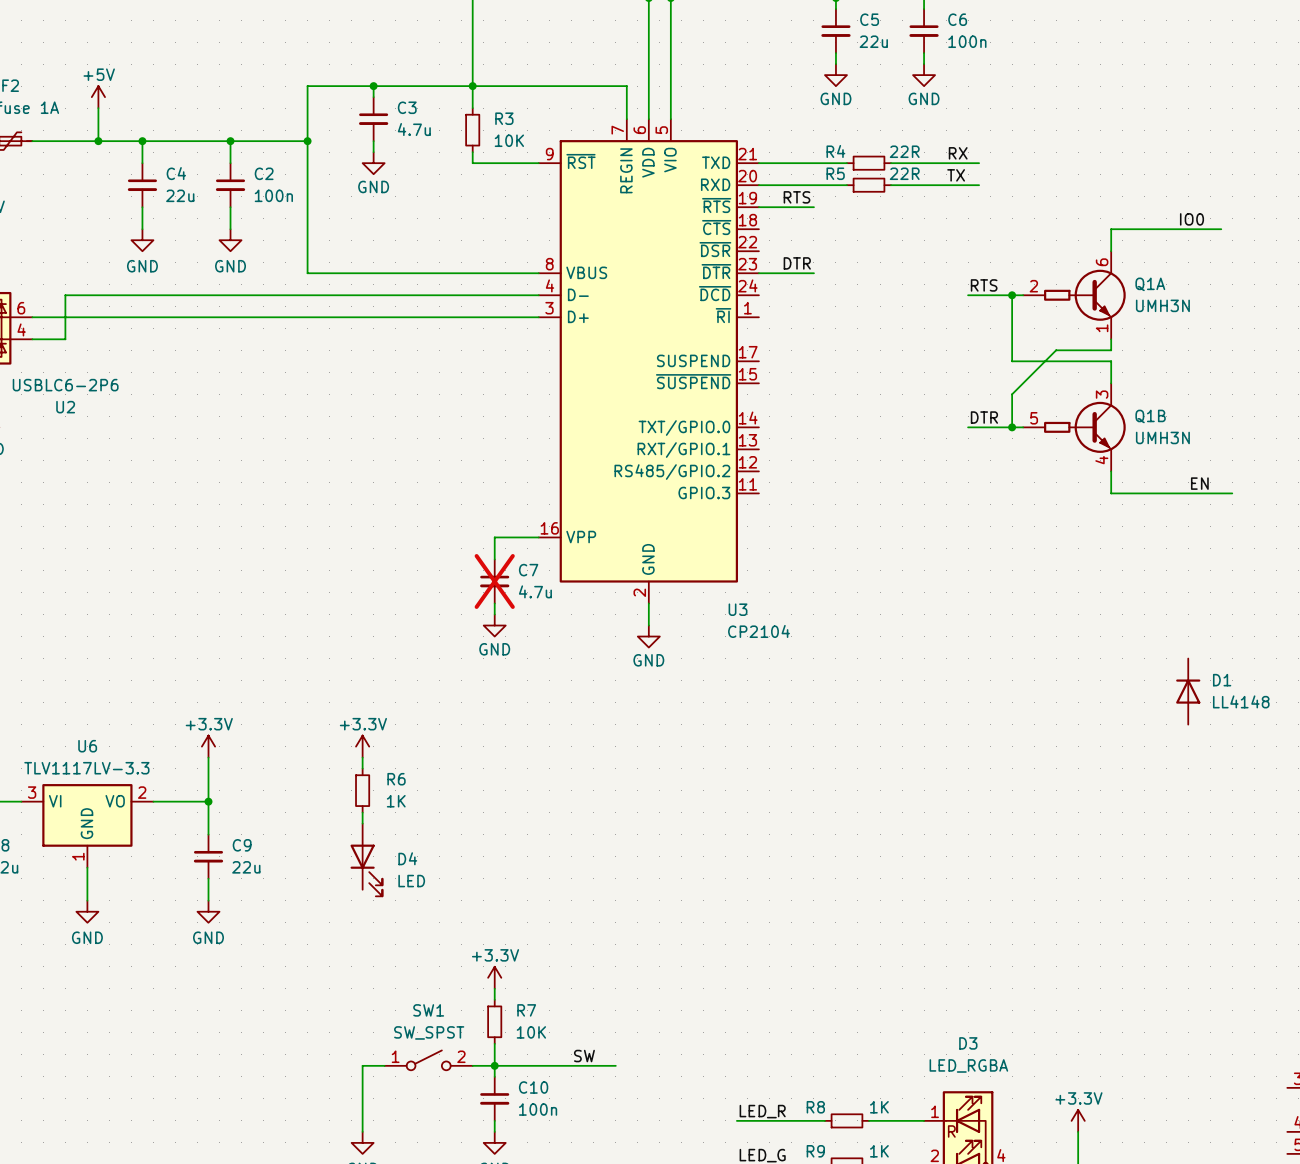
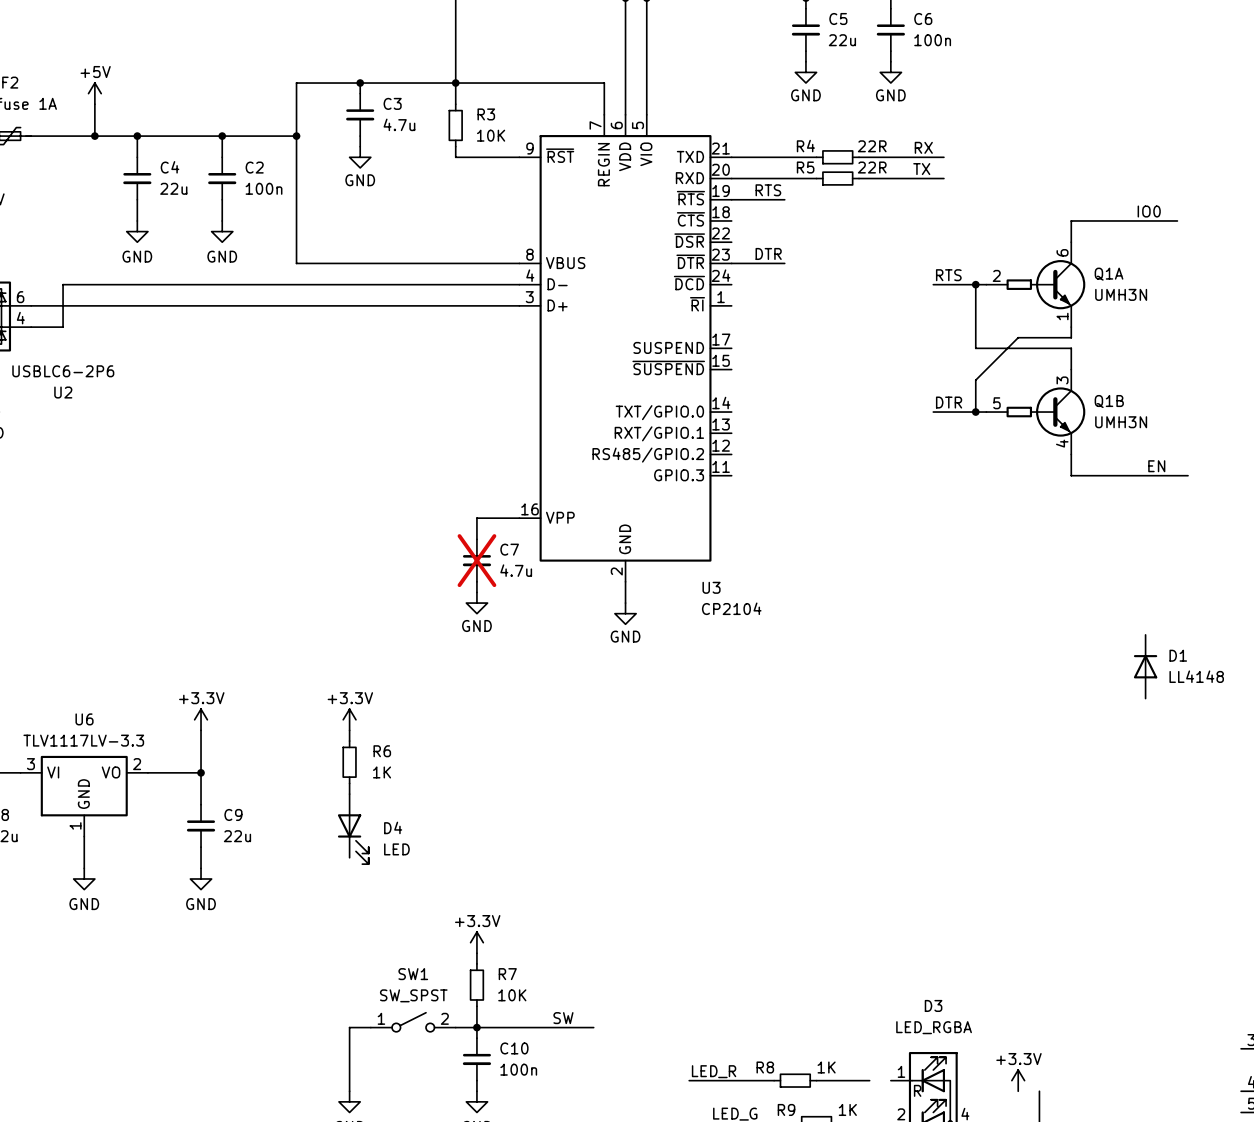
label position: LED_R (762, 1111) -> LED_R (714, 1071)
wire: (802, 1120) (824, 1120) -> (816, 1080) (837, 1080)
R8 position: (846, 1120) -> (795, 1080)
wire: (902, 1120) (924, 1120) -> (689, 1080) (710, 1080)
power symbol position: +3.3V (1078, 1120) -> +3.3V (1018, 1080)

